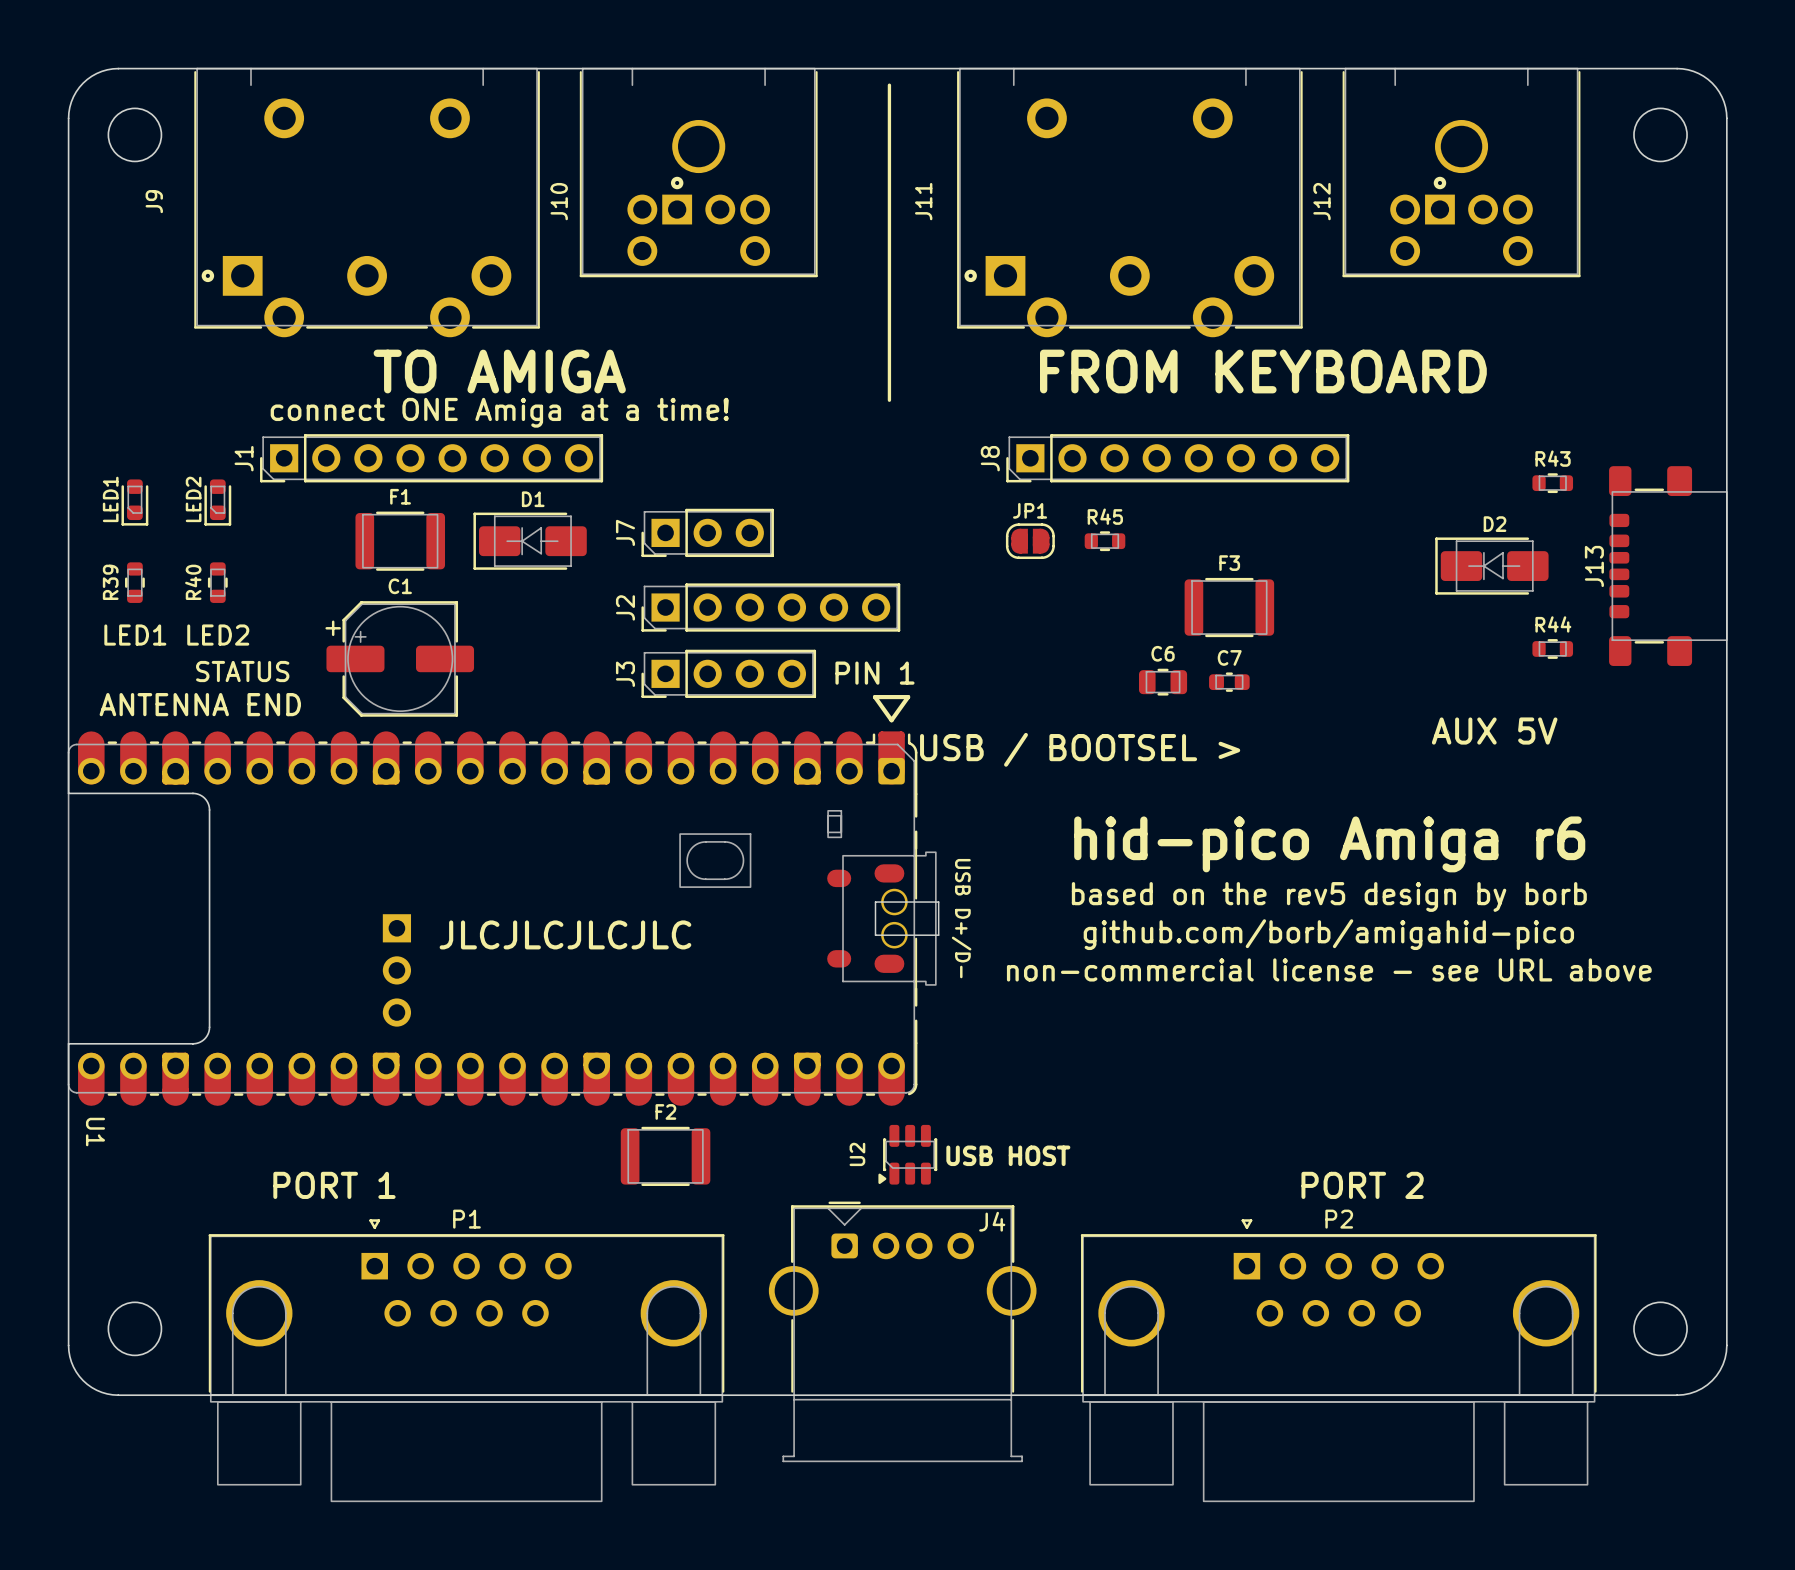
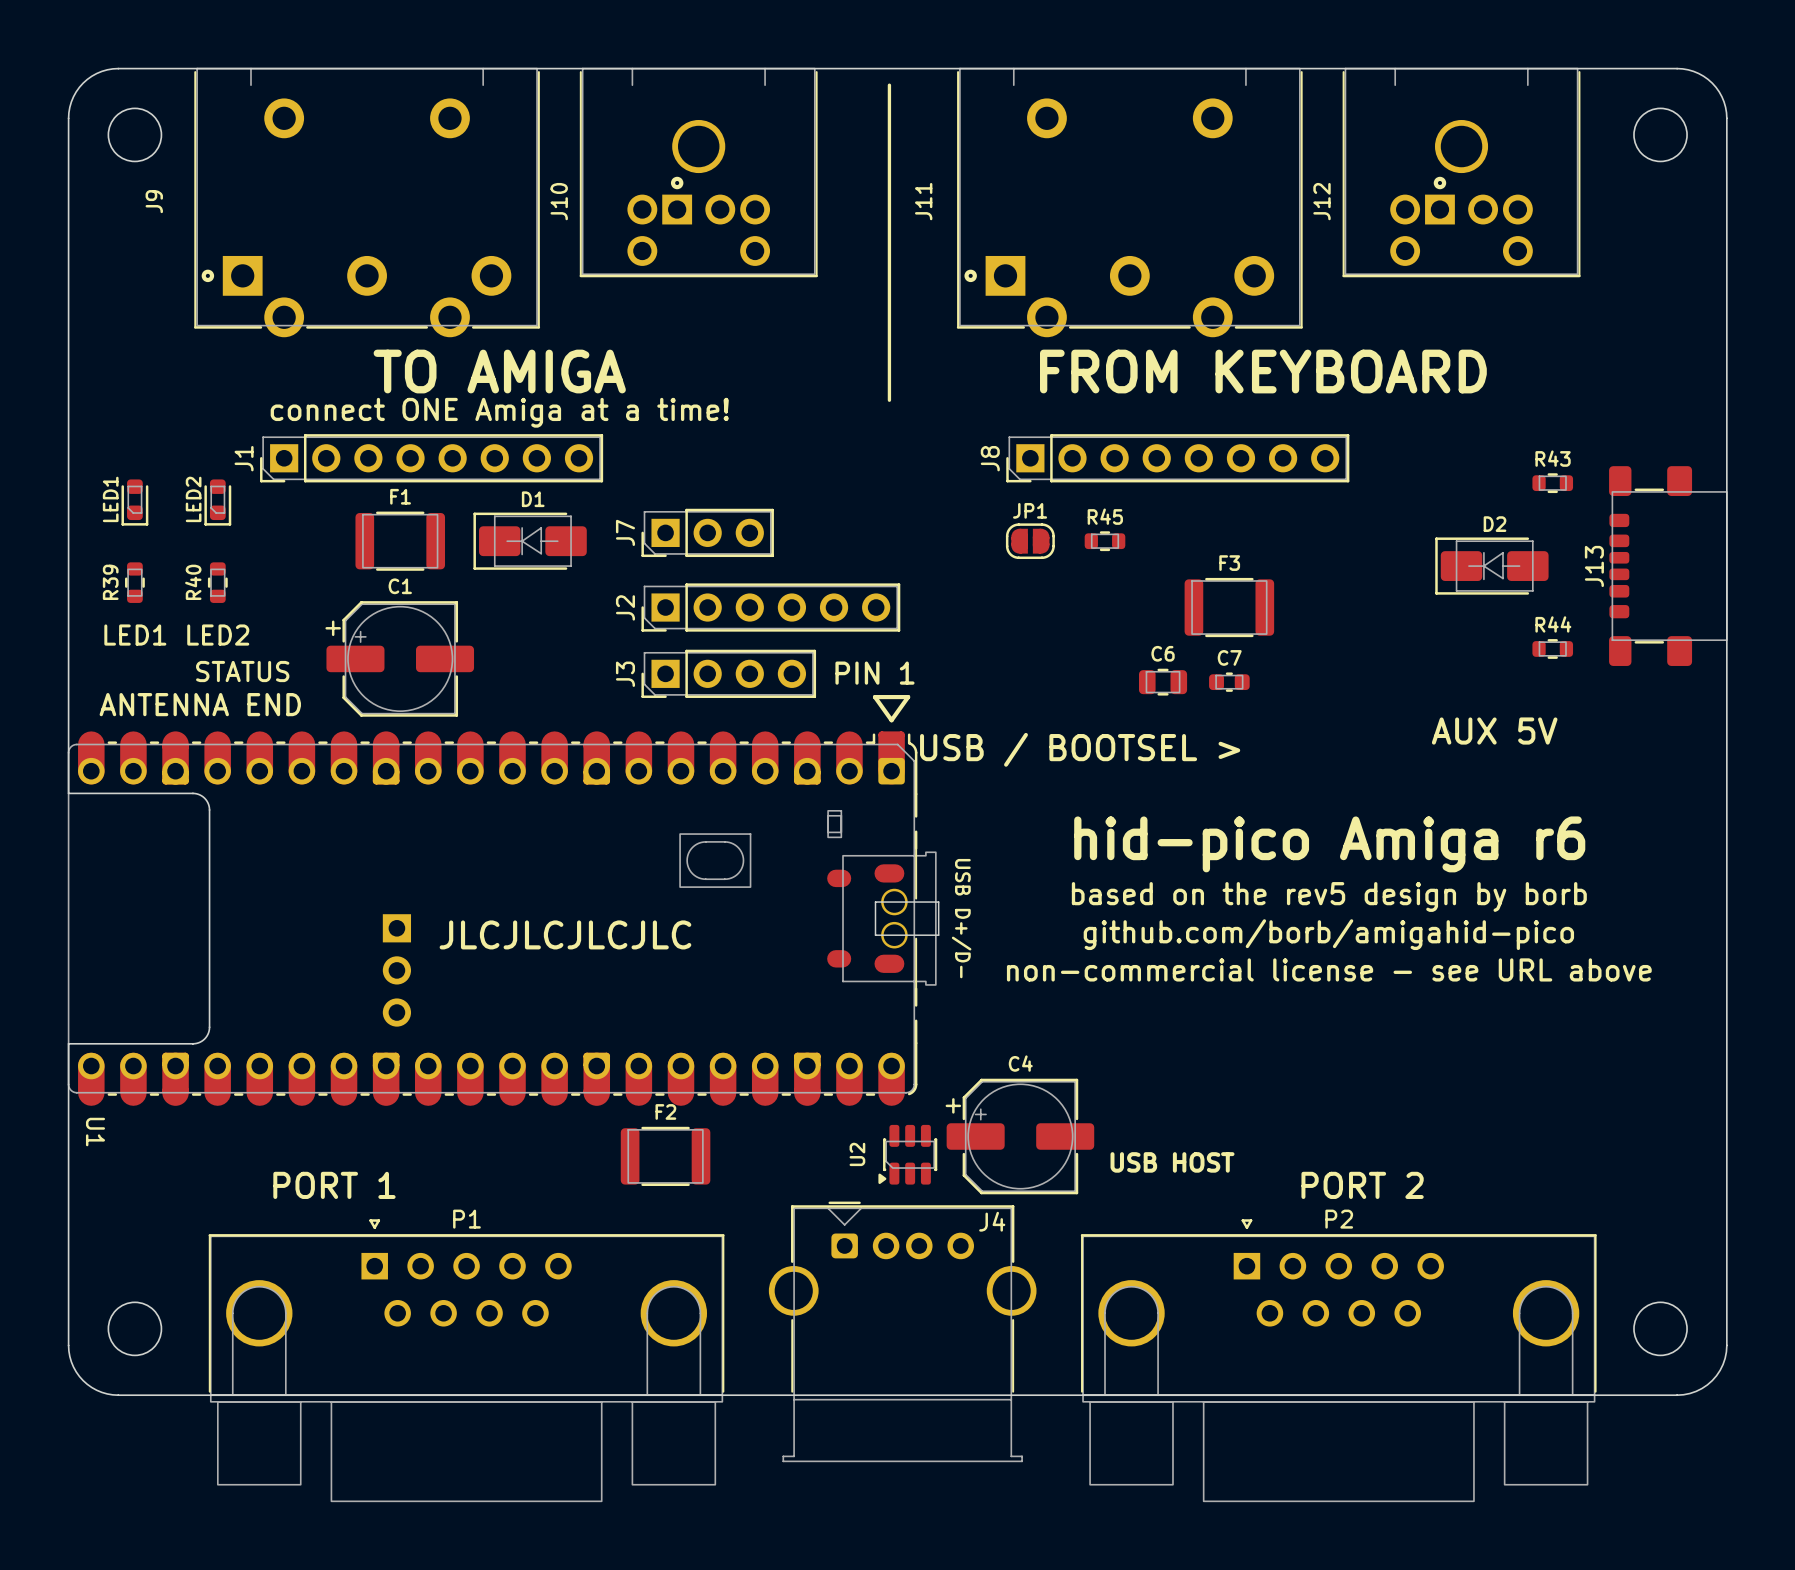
C4: none -> (1019, 1136)
text position: USB HOST (1008, 1155) -> USB HOST (1172, 1162)

